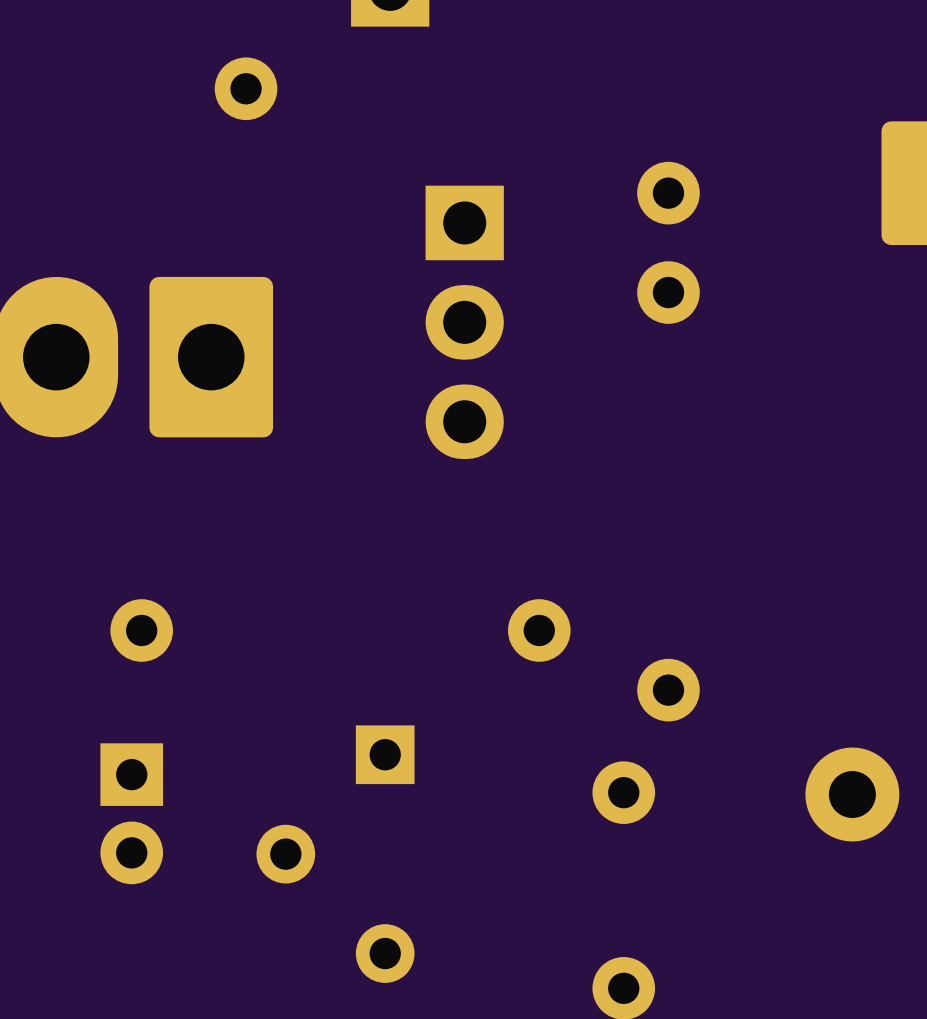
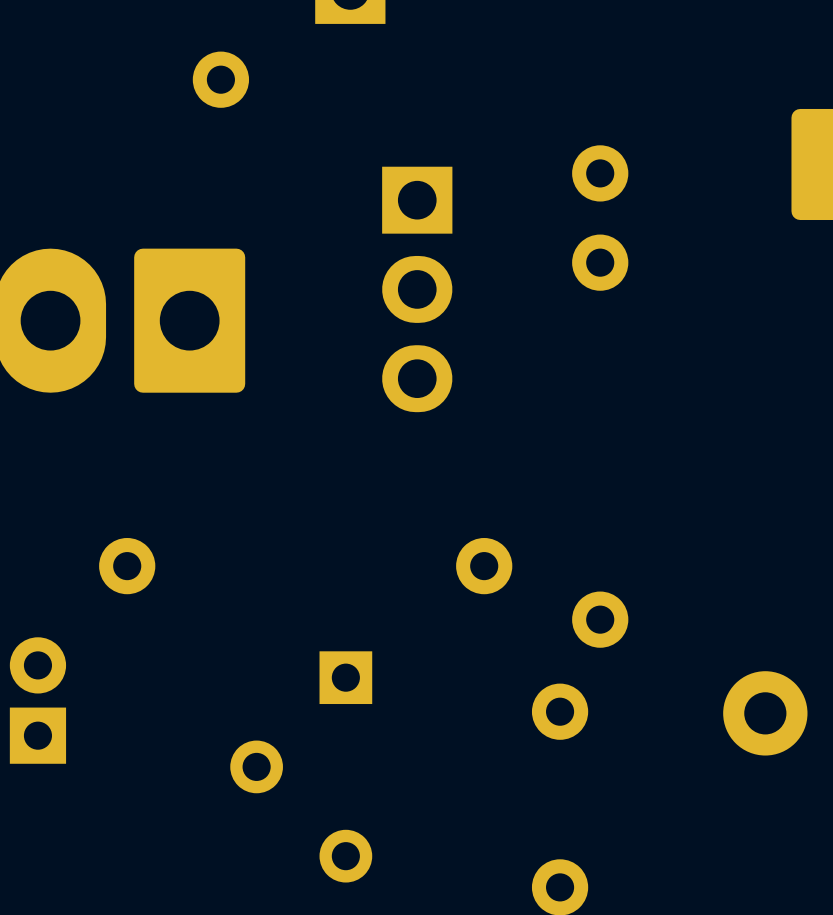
part rotation: 0° (131, 813) -> 180° (37, 700)
part position: (131, 813) -> (37, 700)

